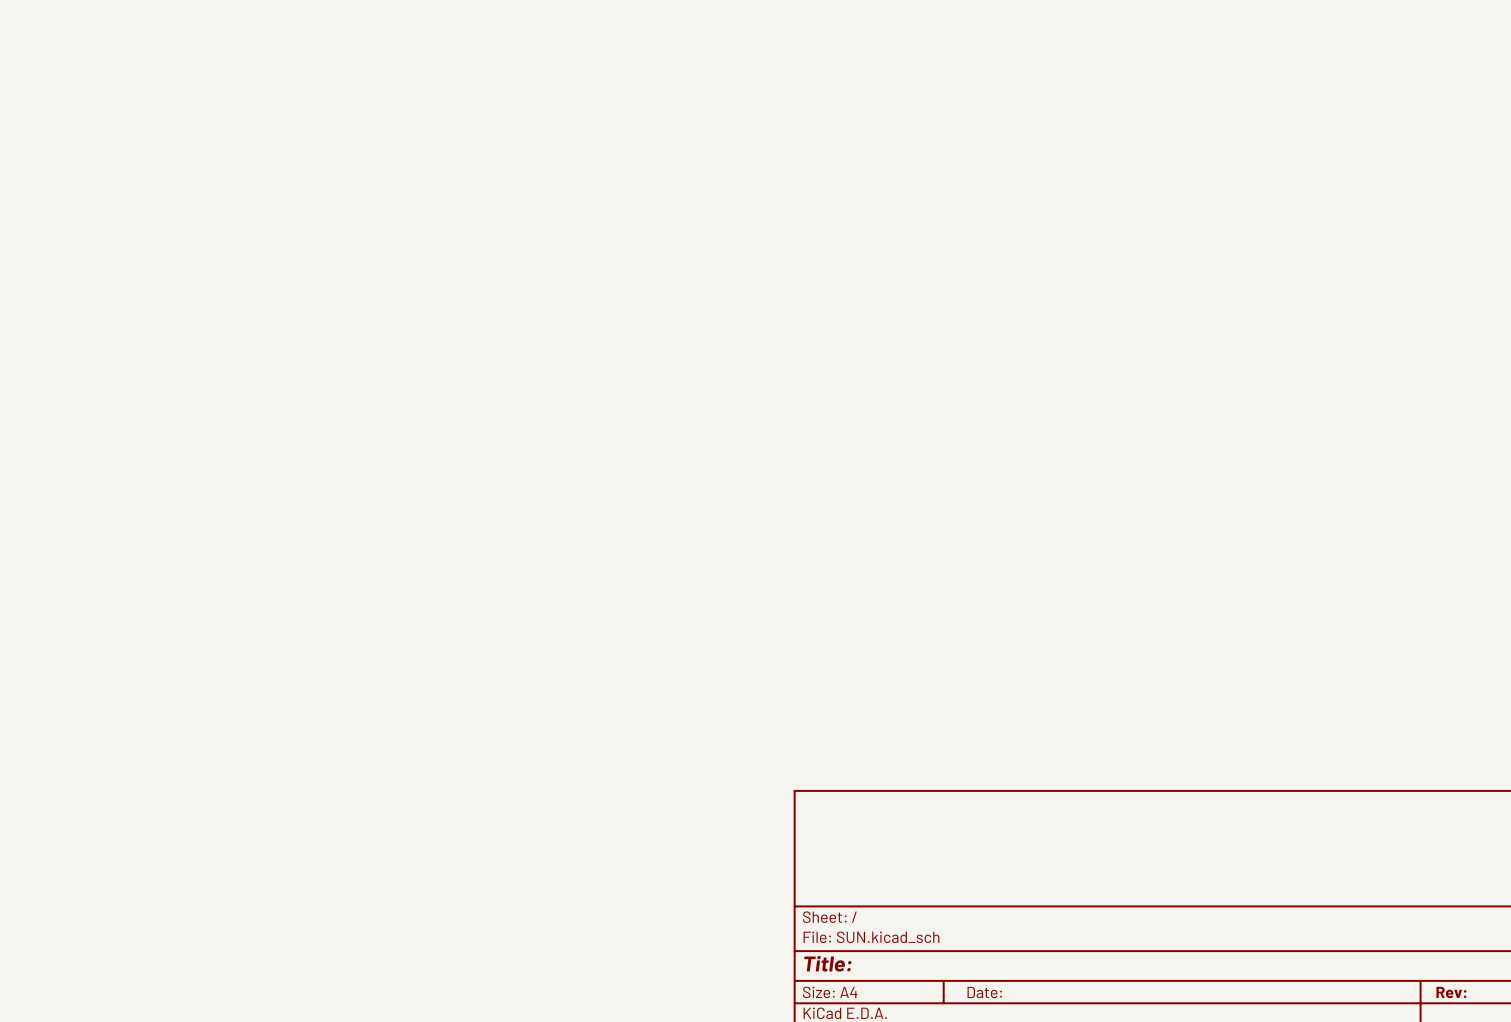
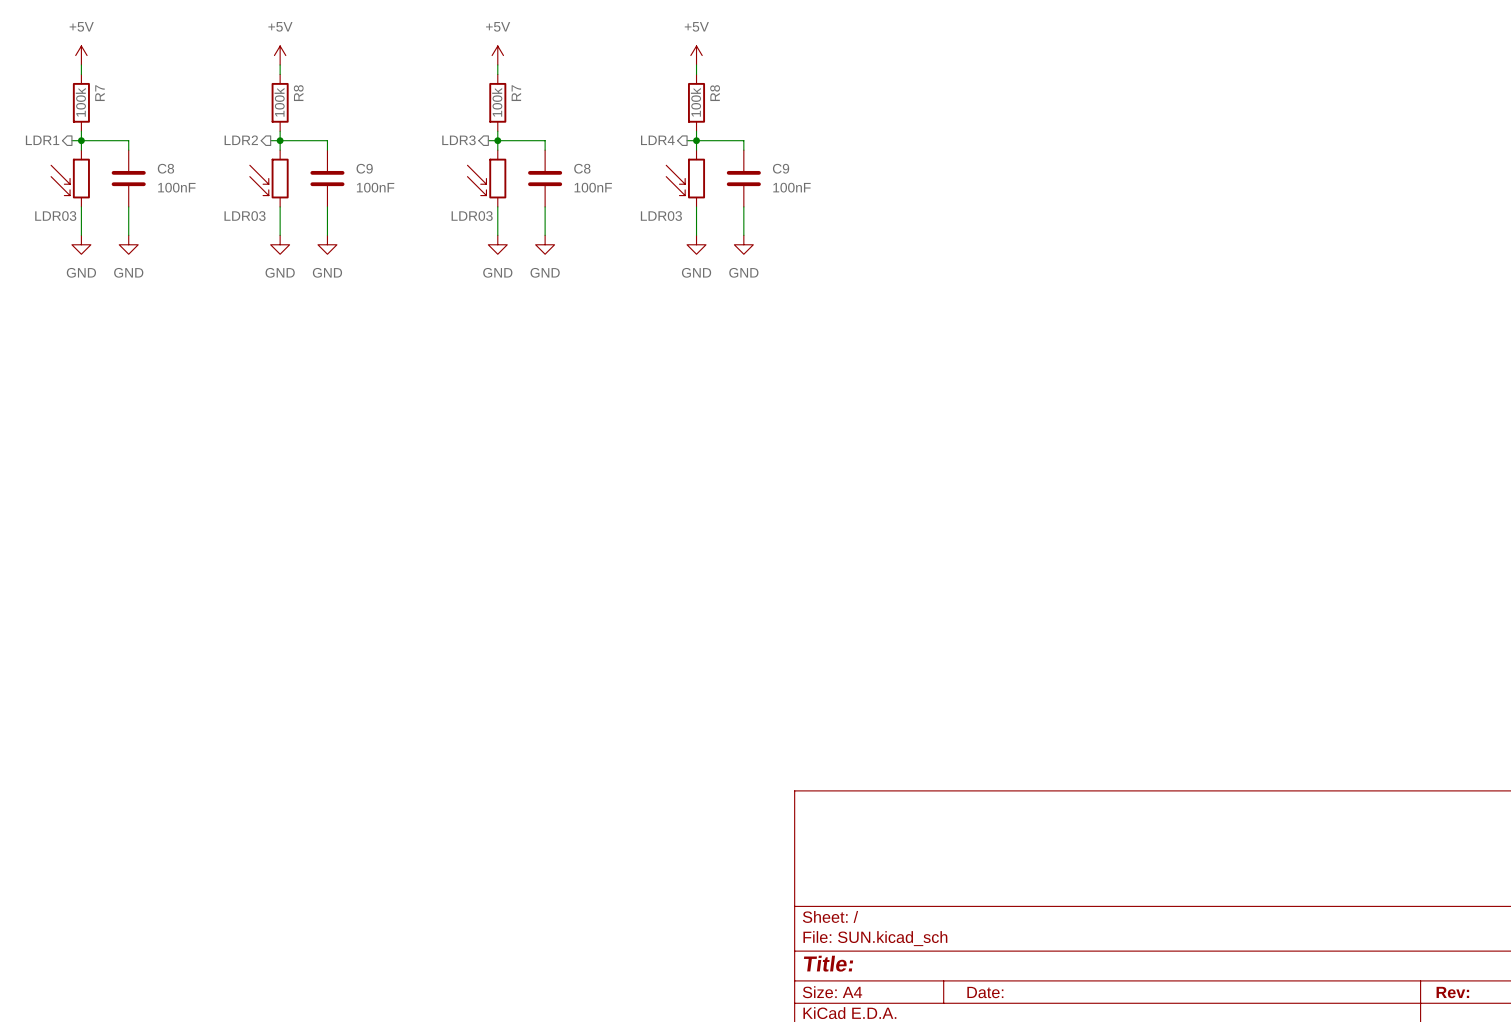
power symbol: none -> +5V (81, 55)
power symbol: none -> +5V (280, 55)
power symbol: none -> +5V (497, 55)
power symbol: none -> +5V (696, 55)
wire: none -> (81, 64) (81, 74)
wire: none -> (280, 64) (280, 74)
wire: none -> (497, 64) (497, 74)
wire: none -> (696, 64) (696, 74)
R7: none -> 100k (81, 102)
R8: none -> 100k (280, 102)
R7: none -> 100k (497, 102)
R8: none -> 100k (696, 102)
wire: none -> (81, 131) (81, 150)
wire: none -> (280, 131) (280, 150)
wire: none -> (497, 131) (497, 150)
wire: none -> (696, 131) (696, 150)
hierarchical label: none -> LDR1 (42, 140)
wire: none -> (71, 140) (128, 140) (128, 150)
junction: none -> (81, 140)
hierarchical label: none -> LDR2 (241, 140)
wire: none -> (270, 140) (327, 140) (327, 150)
junction: none -> (280, 140)
hierarchical label: none -> LDR3 (458, 140)
wire: none -> (488, 140) (545, 140) (545, 150)
junction: none -> (497, 140)
hierarchical label: none -> LDR4 (657, 140)
wire: none -> (687, 140) (743, 140) (743, 150)
junction: none -> (696, 140)
part: none -> LDR03 (70, 178)
C8: none -> 100nF (128, 178)
part: none -> LDR03 (269, 178)
C9: none -> 100nF (327, 178)
part: none -> LDR03 (486, 178)
C8: none -> 100nF (545, 178)
part: none -> LDR03 (685, 178)
C9: none -> 100nF (743, 178)
wire: none -> (81, 206) (81, 235)
wire: none -> (128, 206) (128, 235)
wire: none -> (280, 206) (280, 235)
wire: none -> (327, 206) (327, 235)
wire: none -> (497, 206) (497, 235)
wire: none -> (545, 206) (545, 235)
wire: none -> (696, 206) (696, 235)
wire: none -> (743, 206) (743, 235)
power symbol: none -> GND (81, 244)
power symbol: none -> GND (128, 244)
power symbol: none -> GND (280, 244)
power symbol: none -> GND (327, 244)
power symbol: none -> GND (497, 244)
power symbol: none -> GND (545, 244)
power symbol: none -> GND (696, 244)
power symbol: none -> GND (743, 244)

